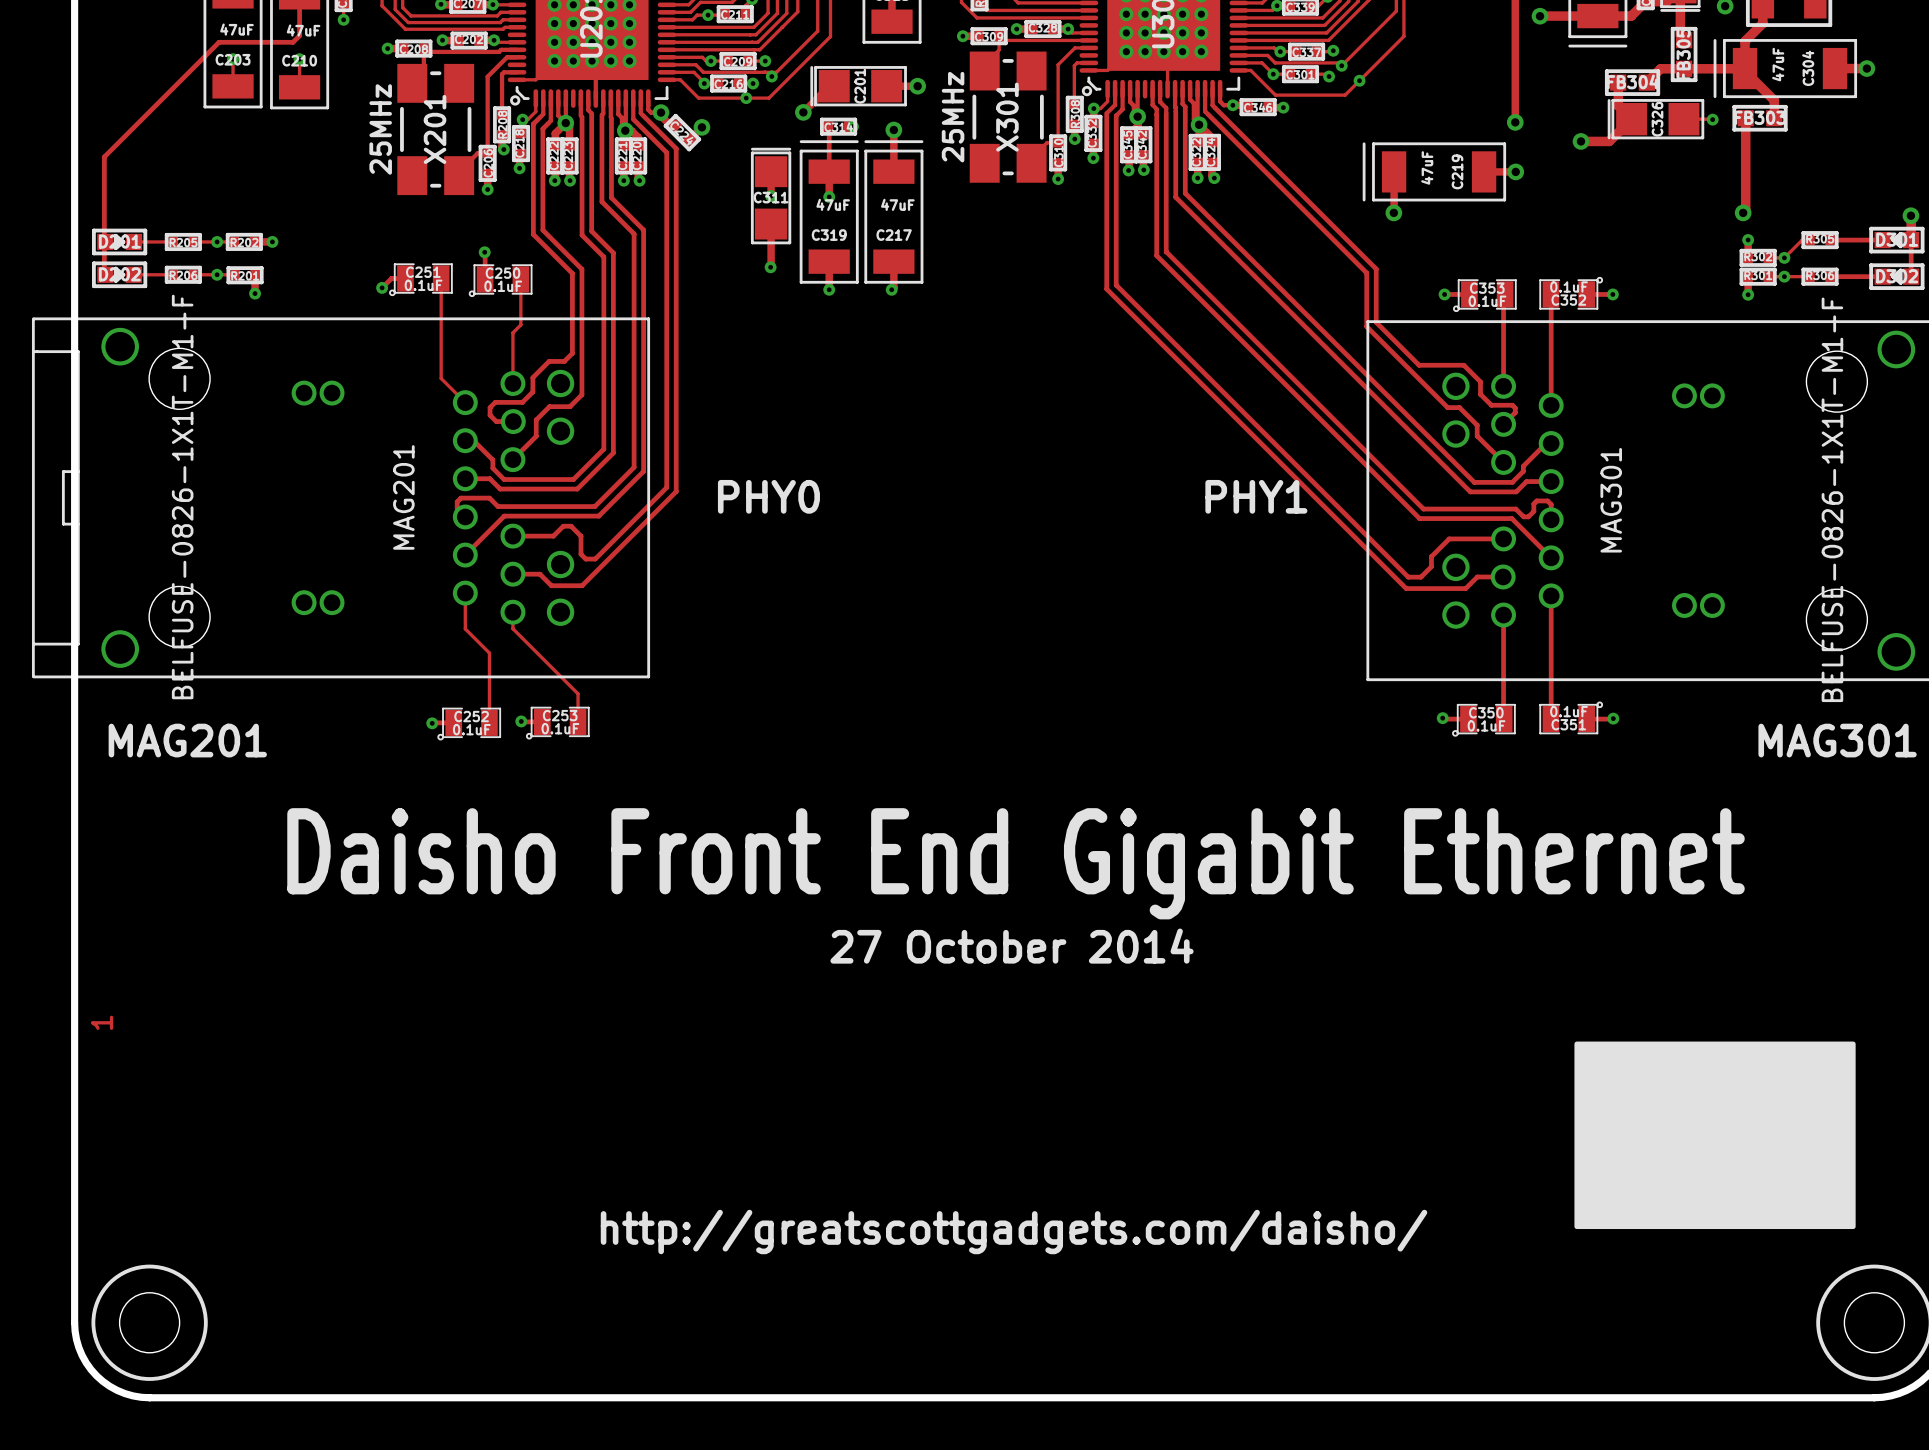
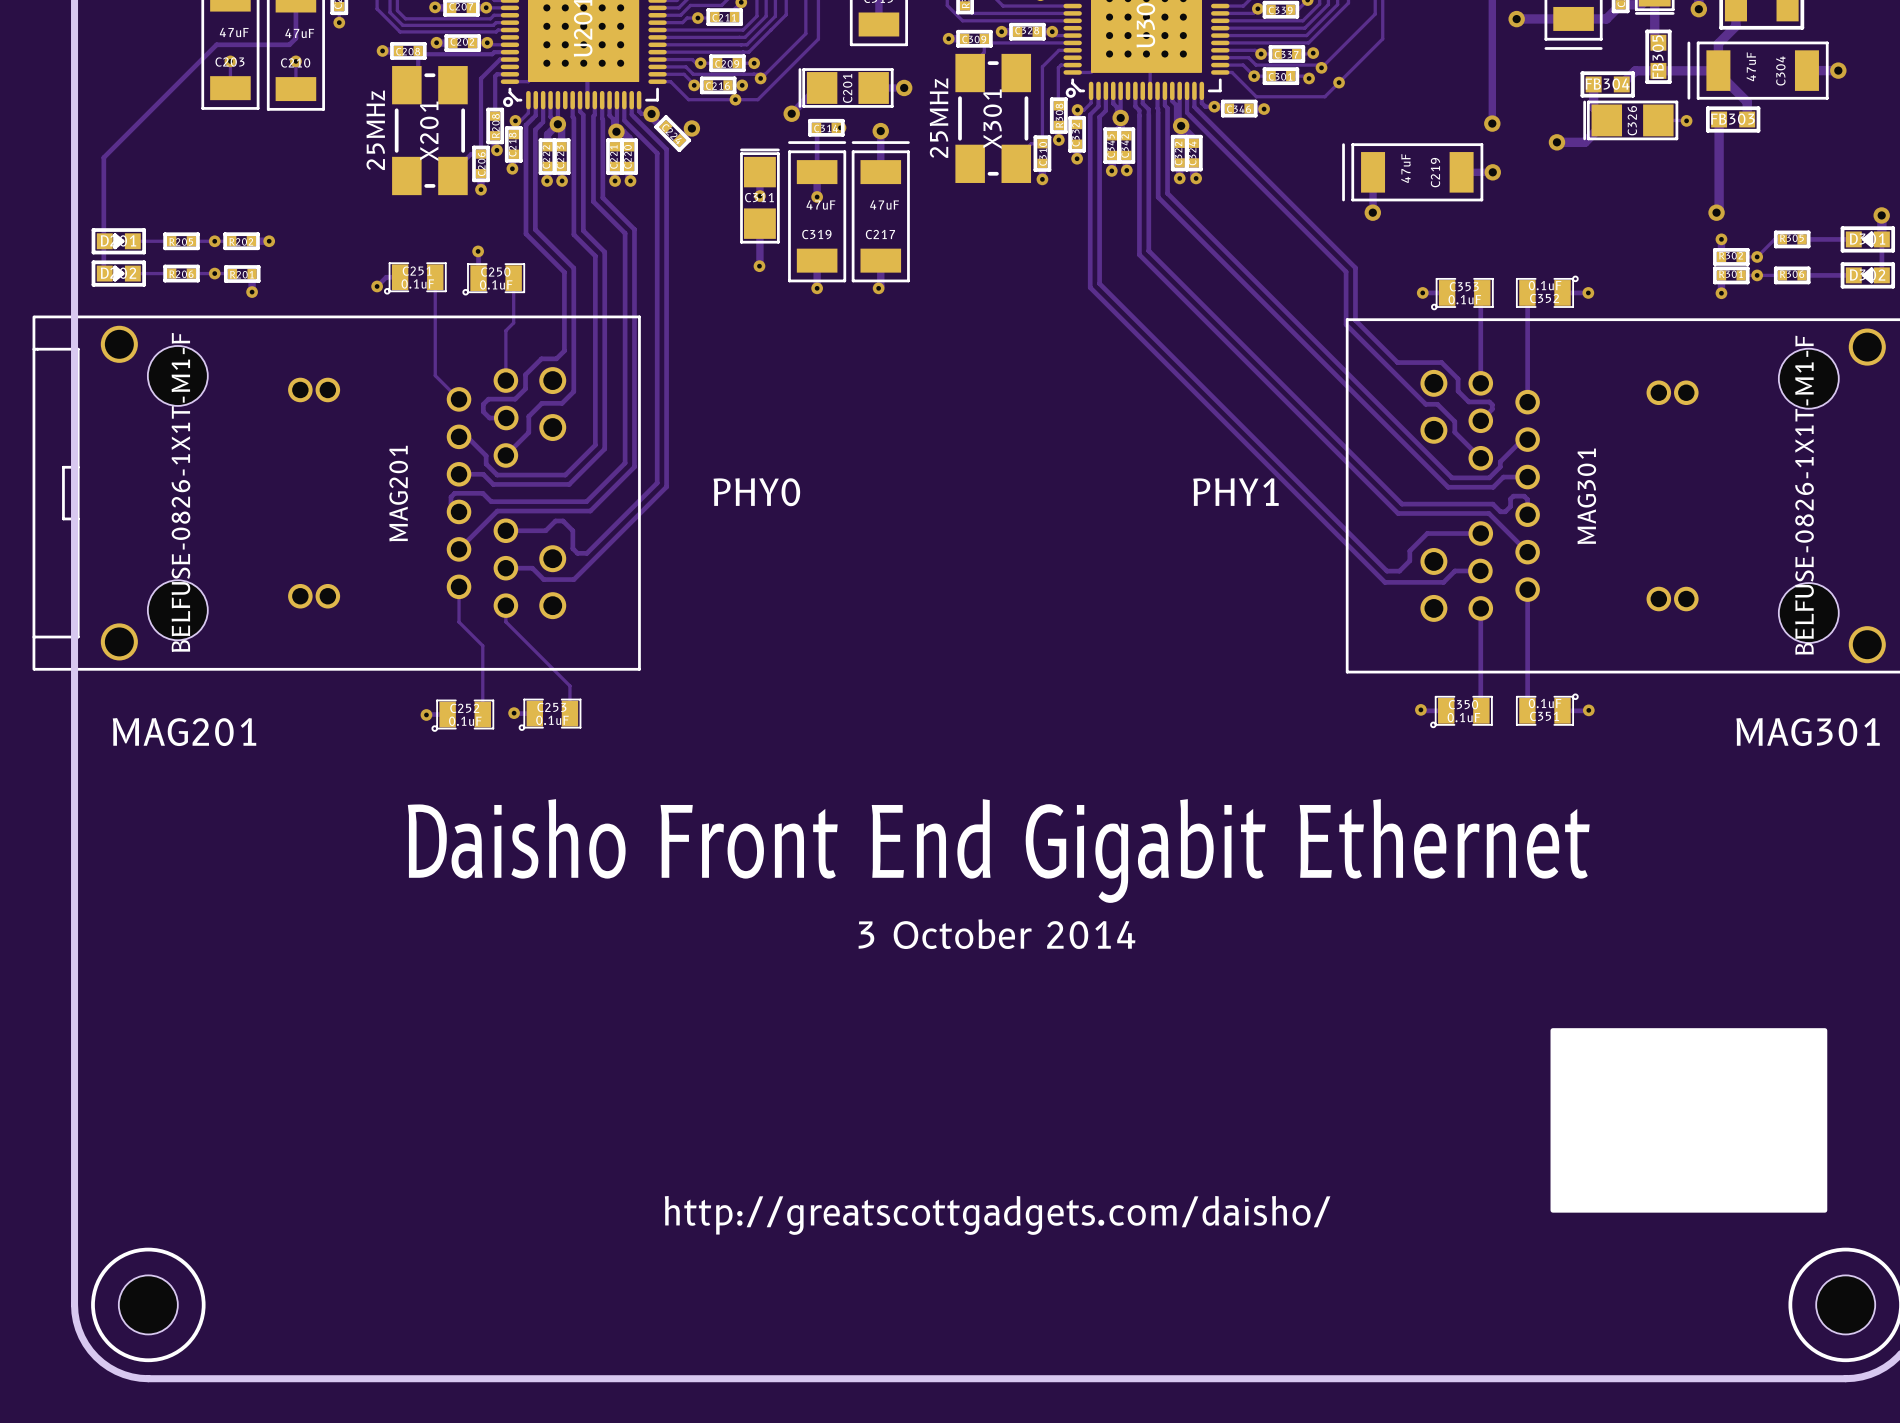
text: 27 October 2014 (1012, 946) -> 3 October 2014 (997, 934)
text: 1 (102, 1022) -> none

